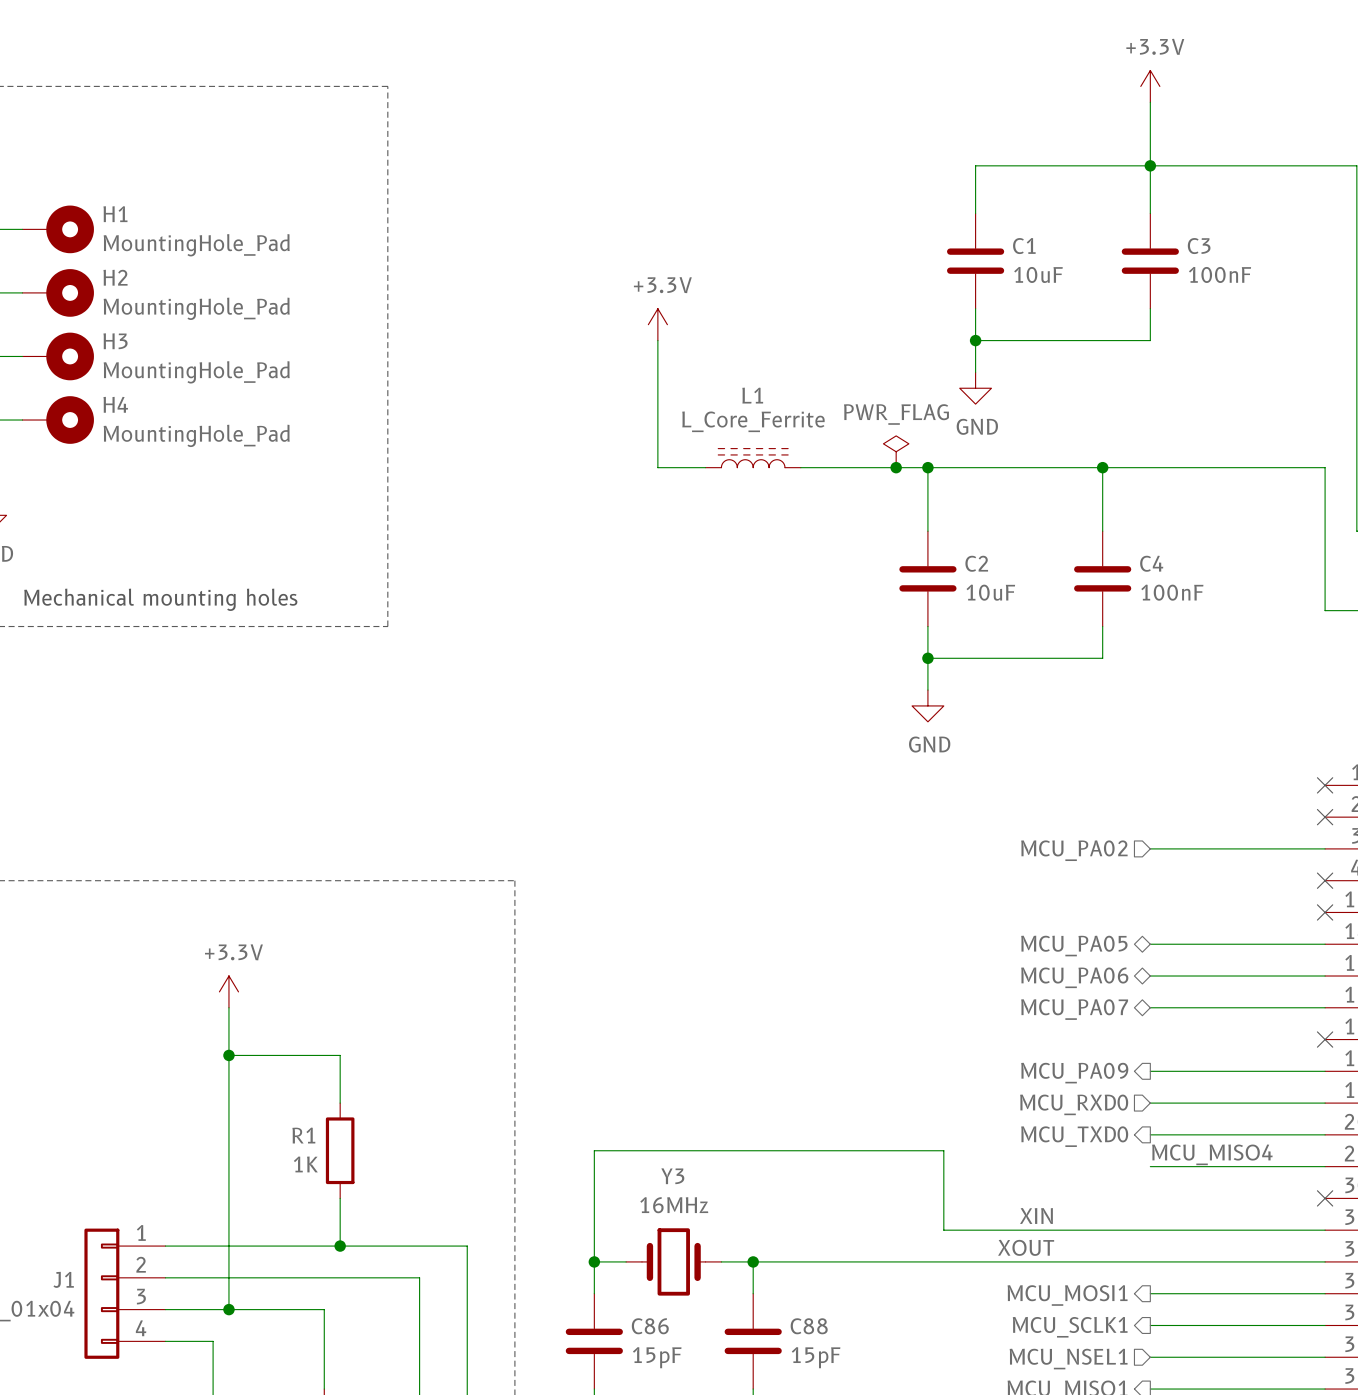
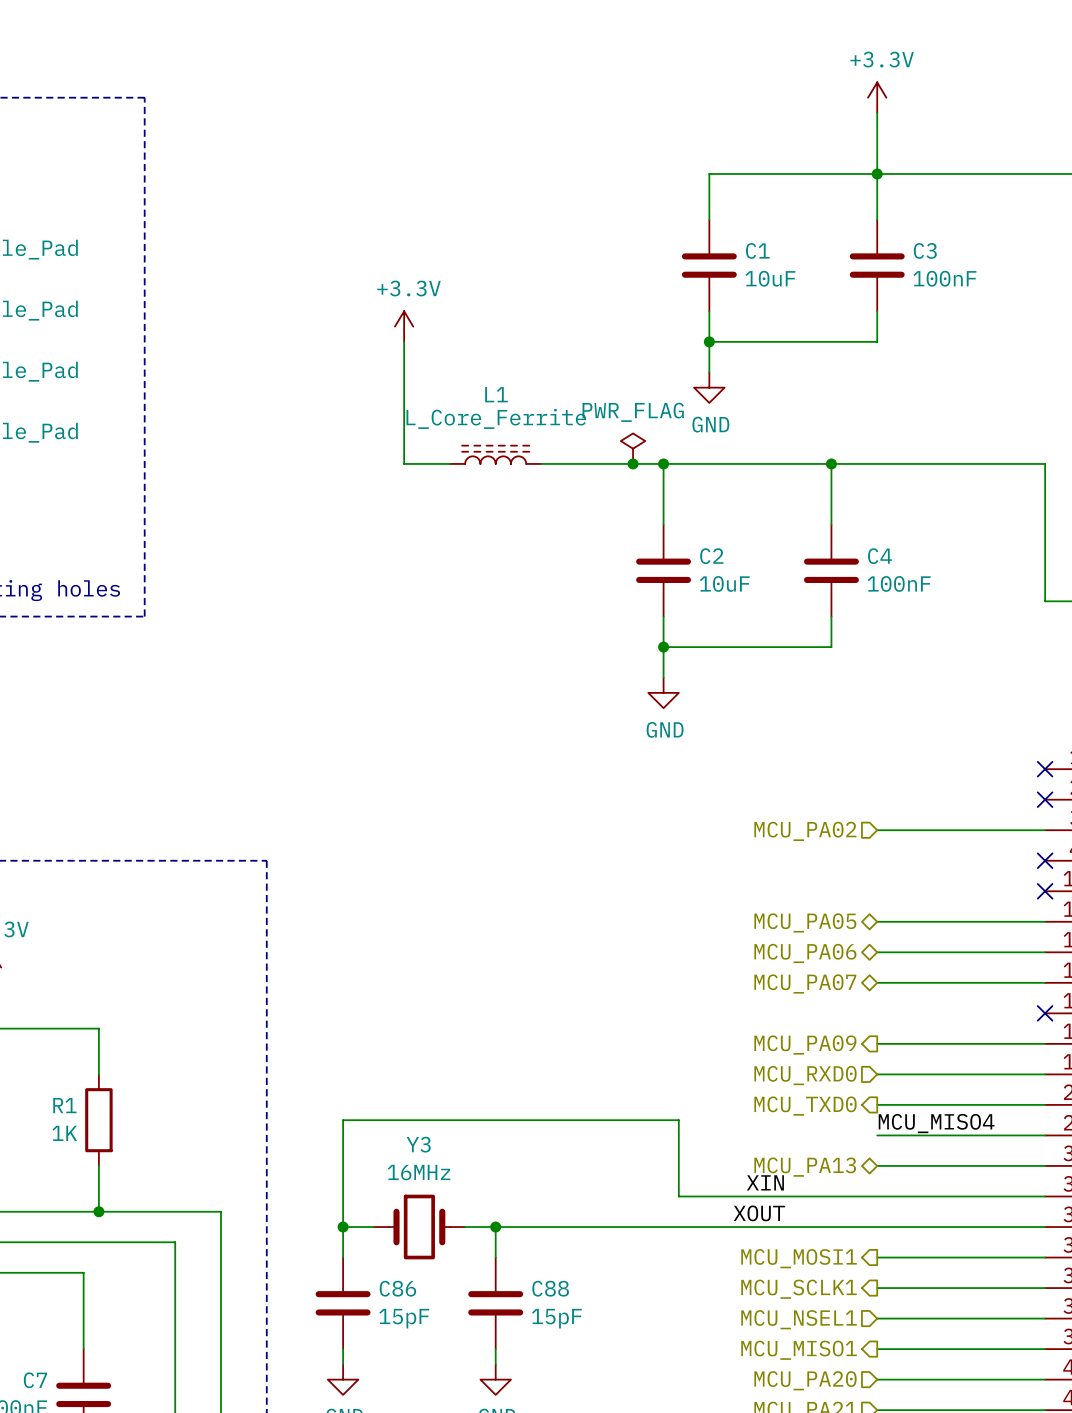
wire: none -> (877, 1165) (1045, 1165)
no-connect mark: (1325, 1198) -> none
hierarchical label: none -> MCU_PA13 (805, 1167)

